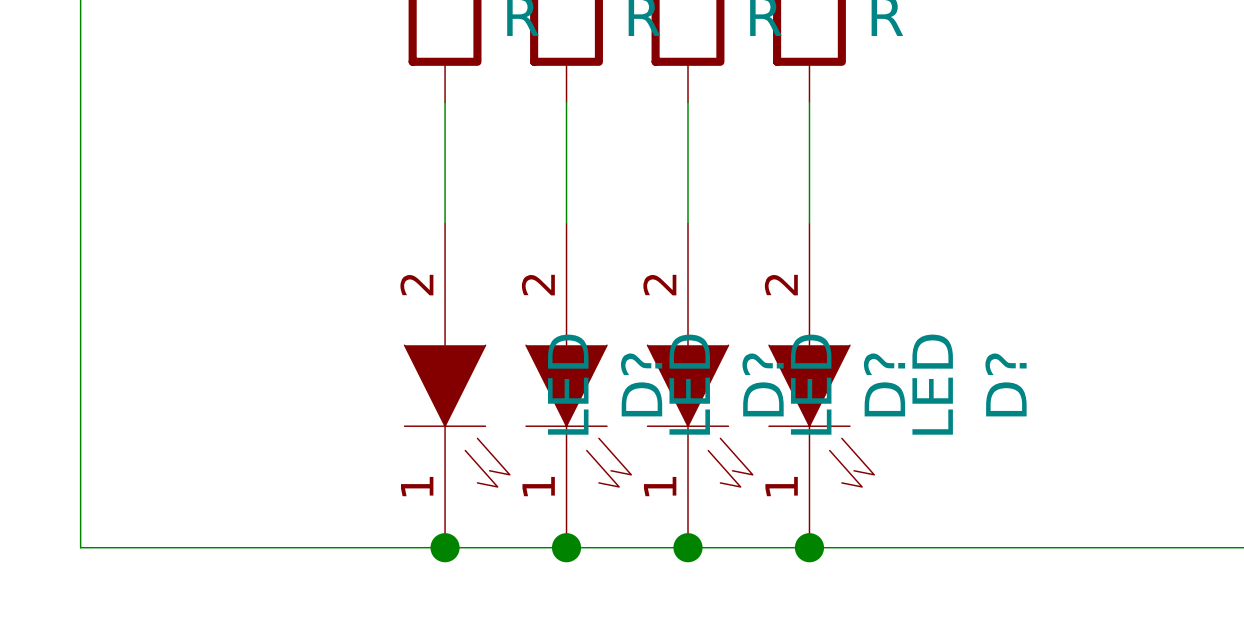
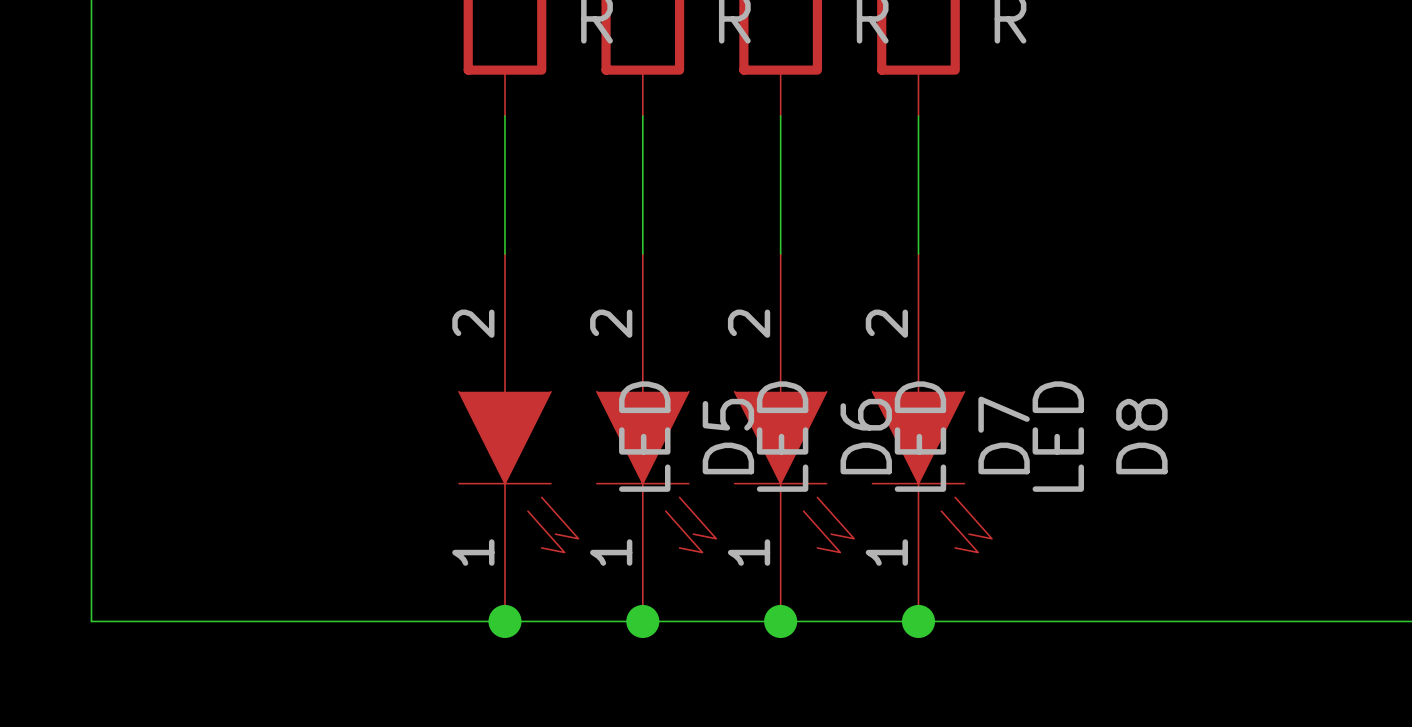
D? name: D? (641, 384) -> D5 (728, 436)
D? name: D? (763, 384) -> D6 (866, 436)
D? name: D? (884, 384) -> D7 (1004, 435)
D? name: D? (1006, 384) -> D8 (1141, 436)

